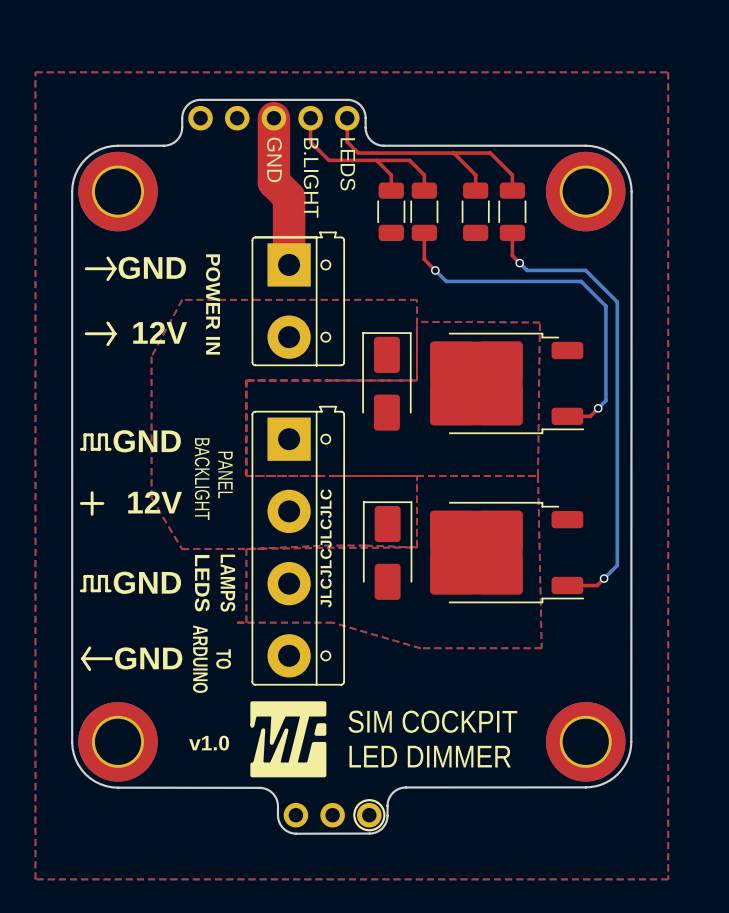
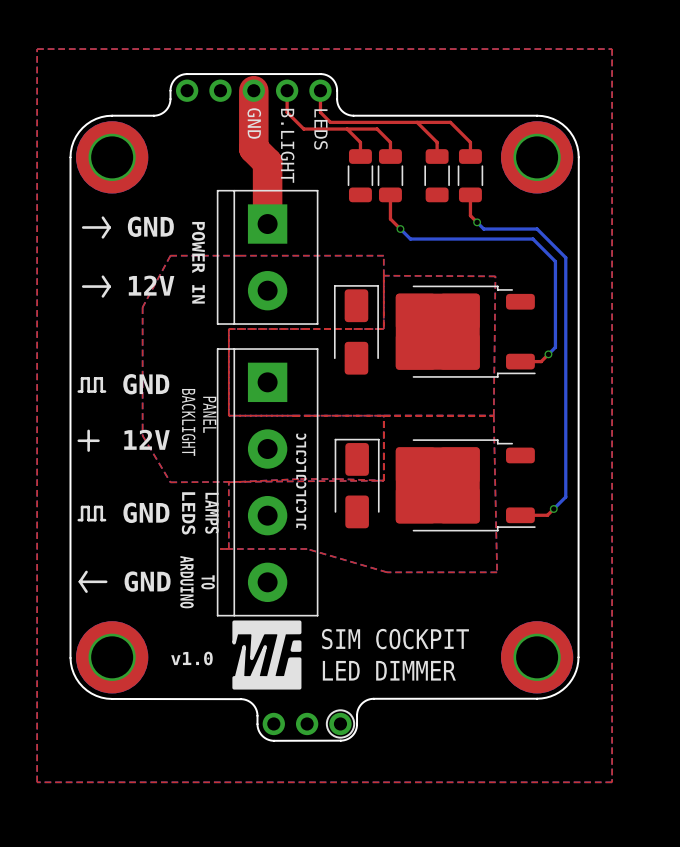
part footprint: [251, 231, 345, 367] -> [216, 189, 319, 325]
part footprint: [251, 405, 345, 686] -> [216, 348, 319, 617]

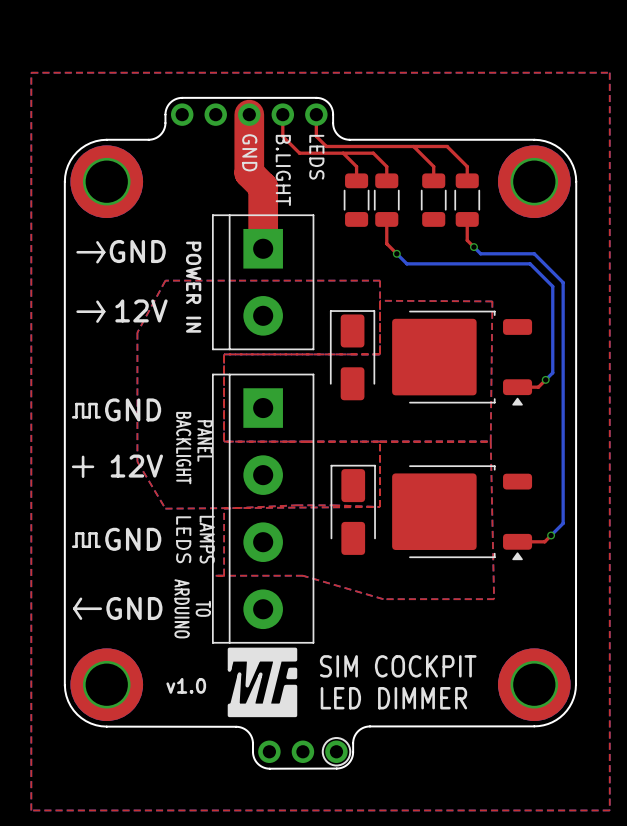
part footprint: [395, 285, 536, 378] -> [392, 310, 533, 406]
part footprint: [395, 439, 536, 532] -> [392, 465, 533, 561]
text: JLCJLCJLCJLC (301, 481) -> none

